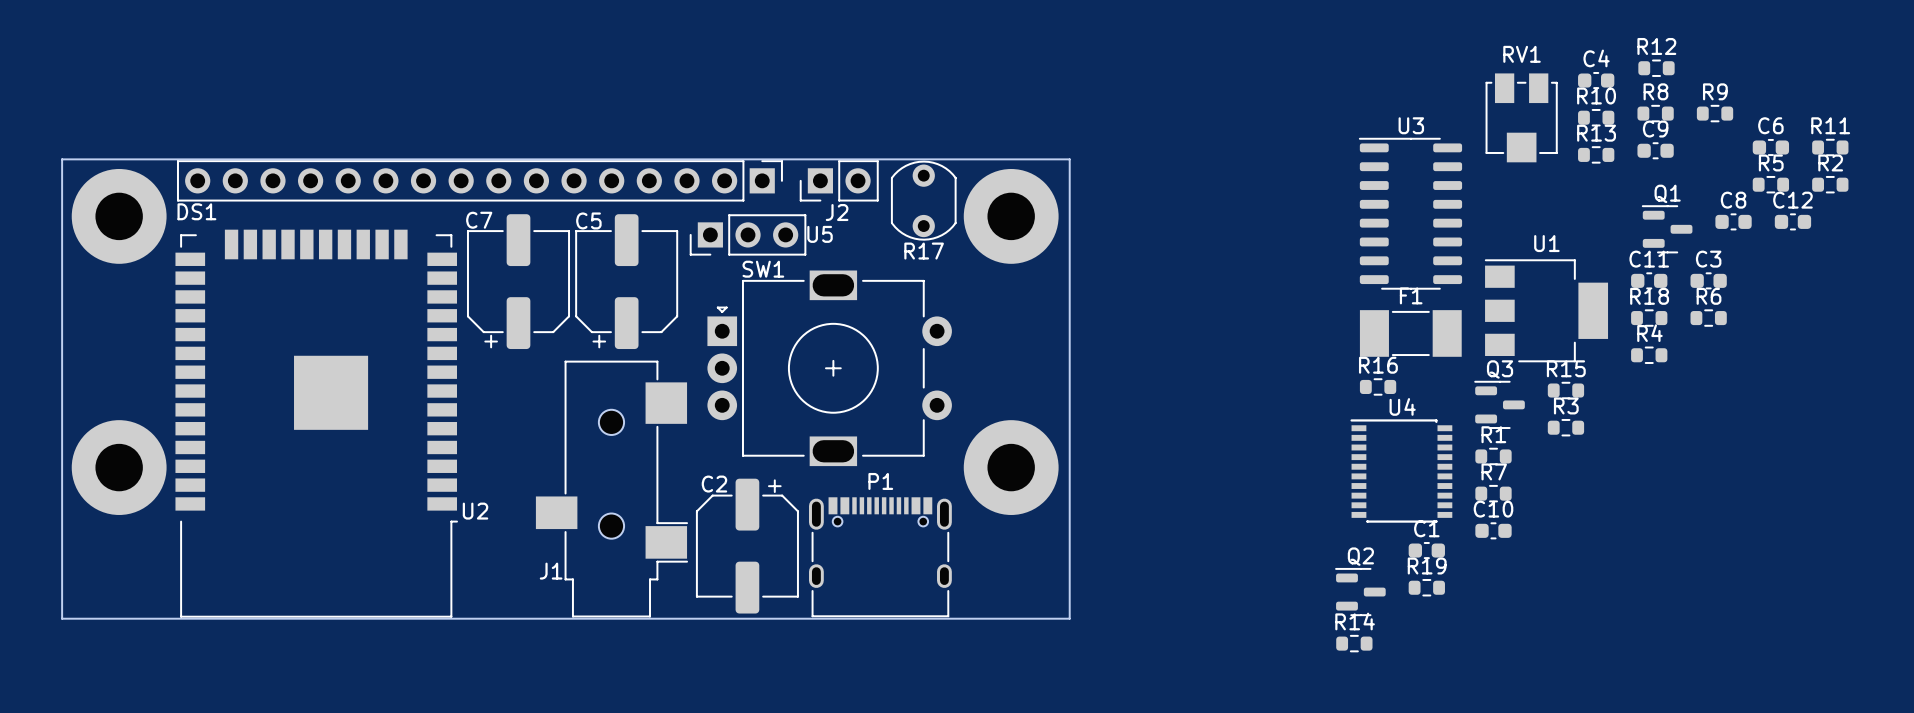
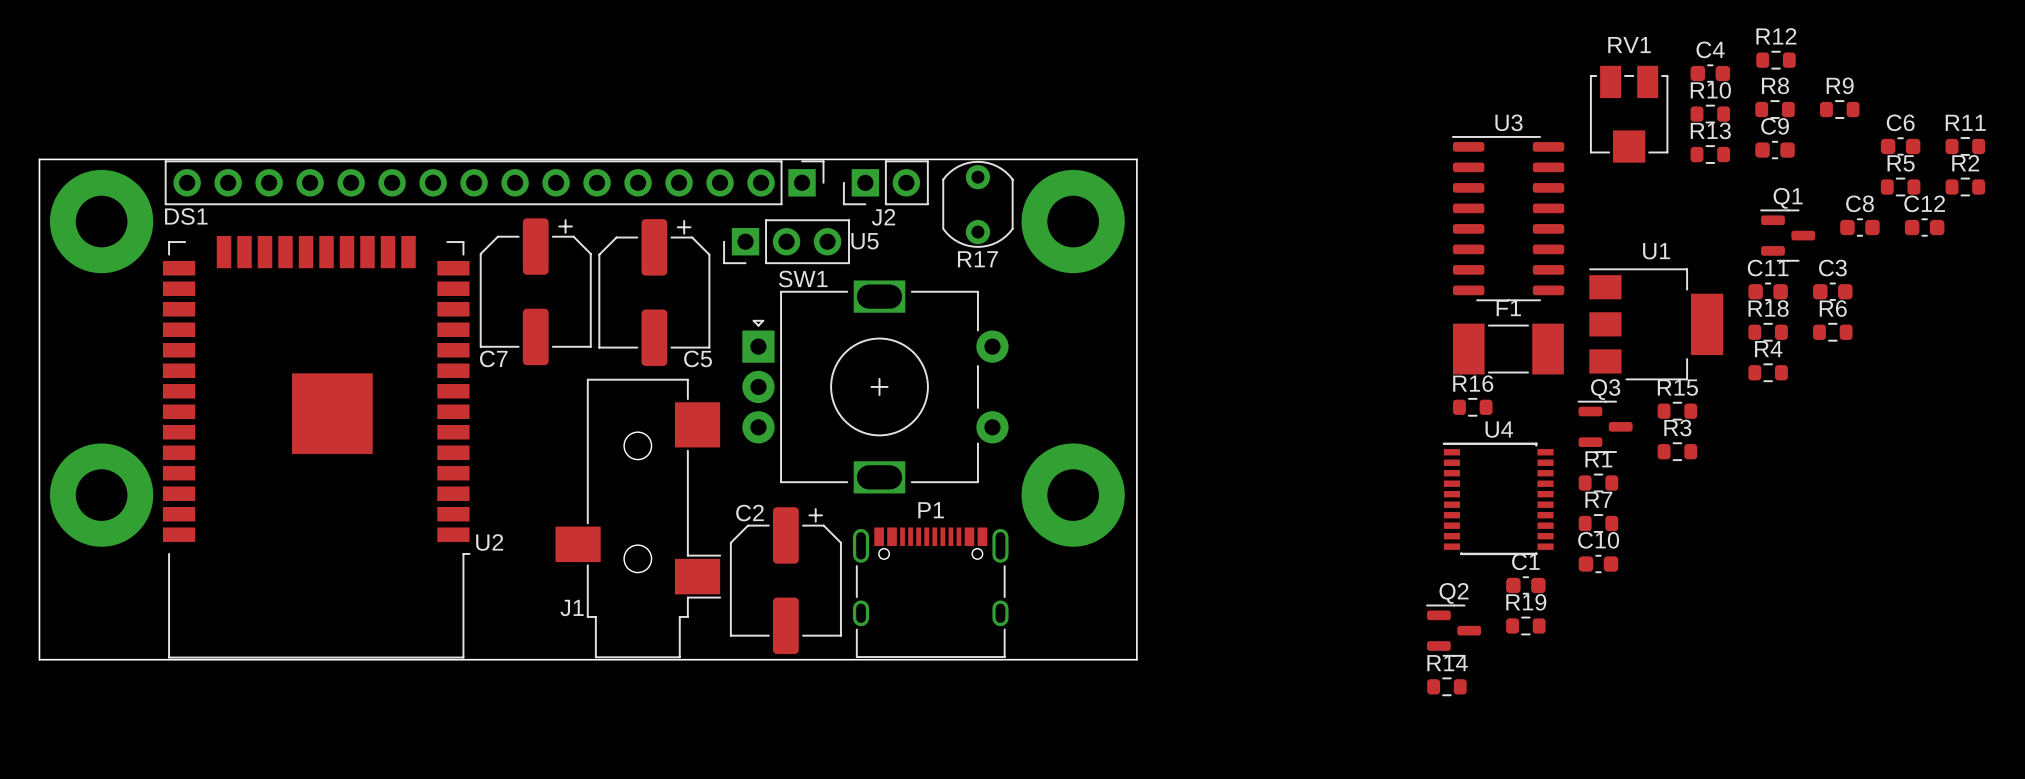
C5 footprint: [575, 214, 679, 350] -> [598, 219, 711, 366]
C7 name position: C7 (479, 220) -> C7 (493, 358)
C5 name position: C5 (588, 220) -> C5 (698, 358)
C7 rotation: 0° (518, 281) -> 180° (535, 291)

